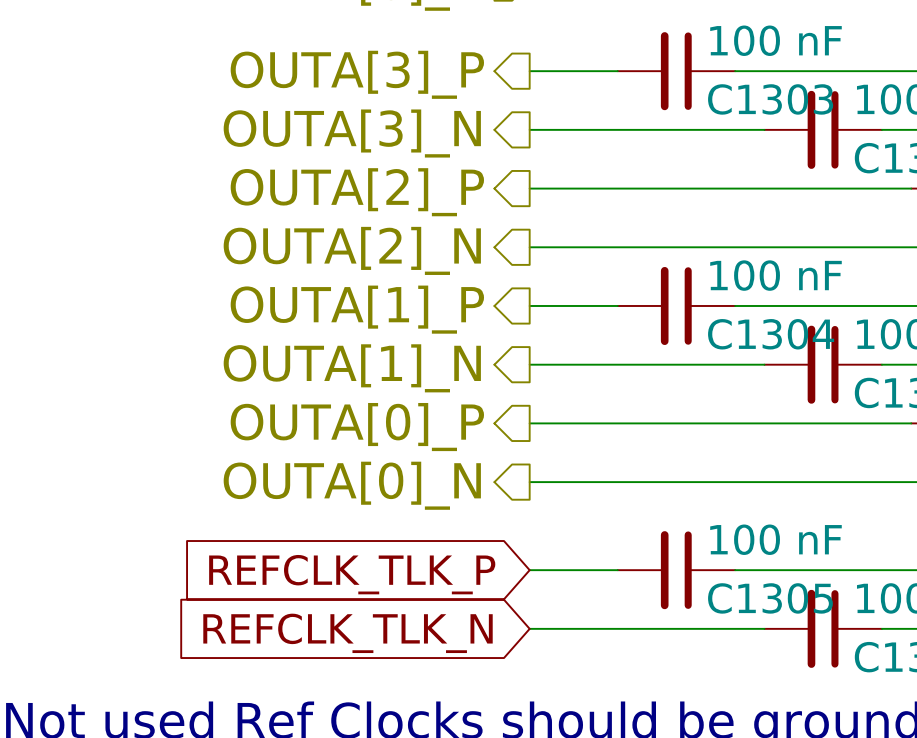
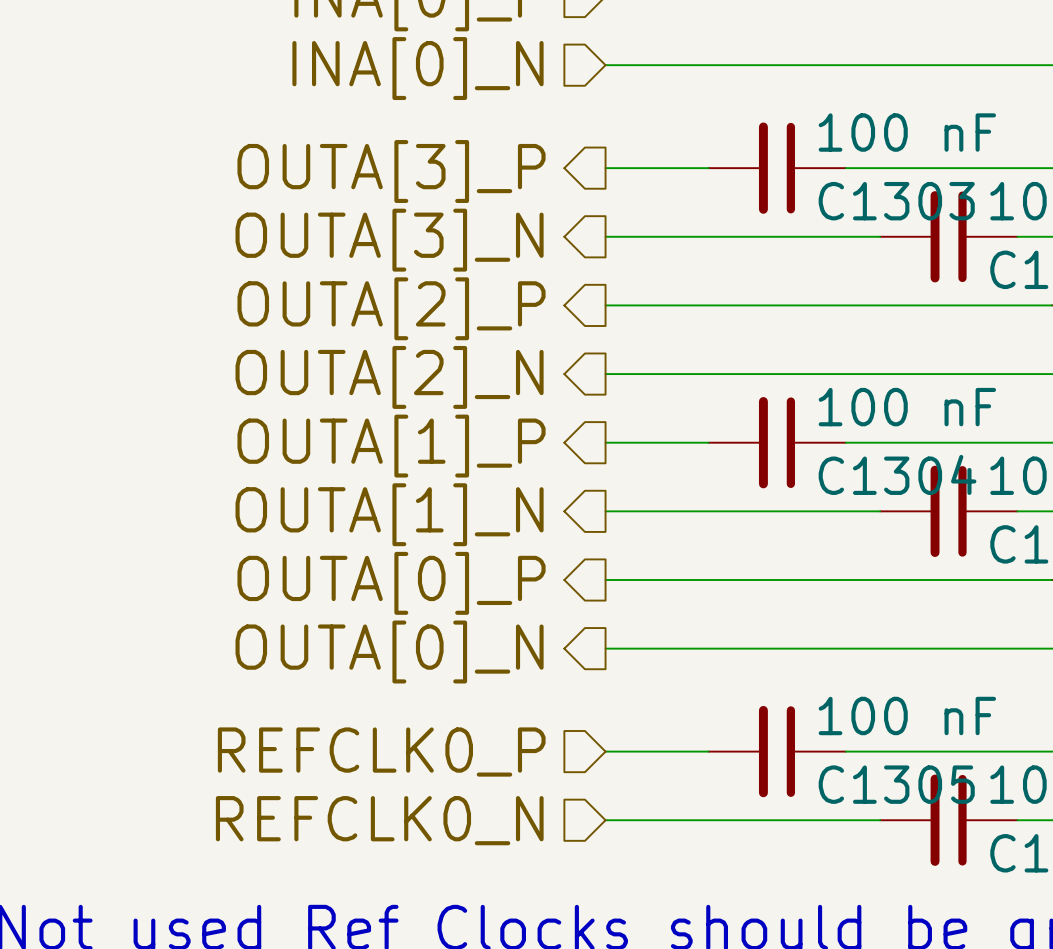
global label: REFCLK_TLK_P (352, 574) -> none
hierarchical label: none -> REFCLK0_P (381, 752)
hierarchical label: none -> REFCLK0_N (379, 820)
global label: REFCLK_TLK_N (348, 633) -> none

